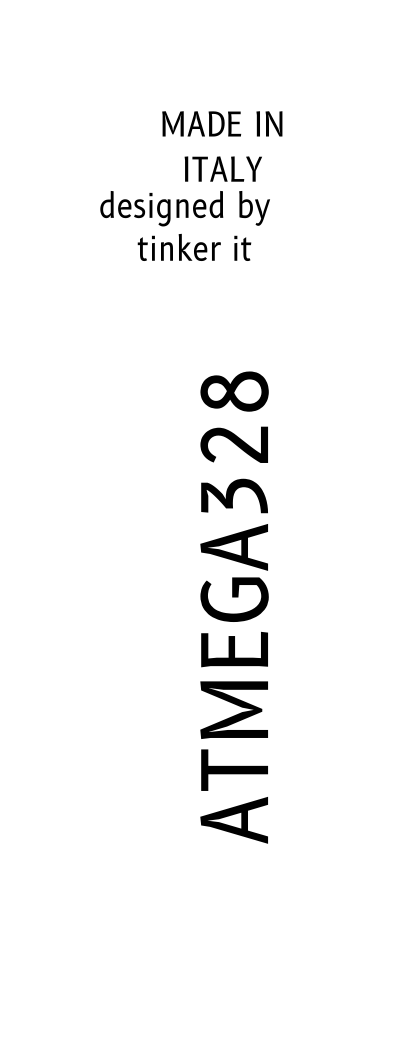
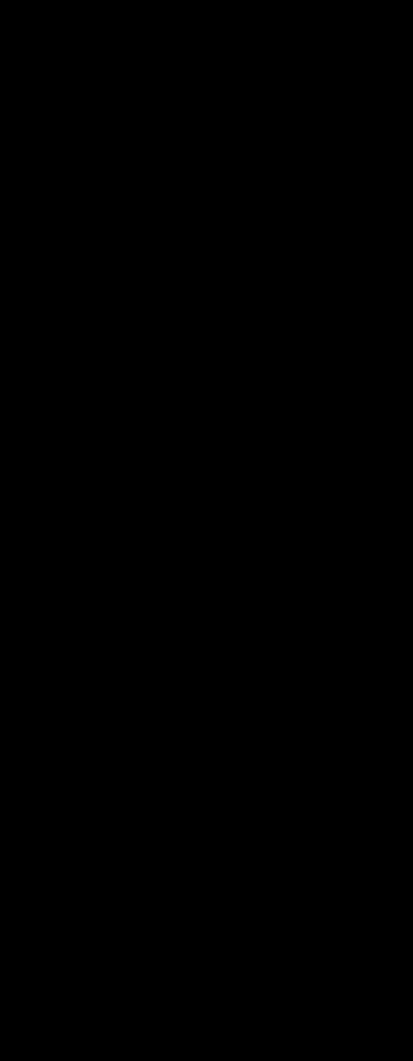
text: MADE IN (222, 123) -> none
text: ITALY (223, 169) -> none
text: designed by (185, 208) -> none
text: tinker it (194, 247) -> none
text: ATMEGA328 (234, 607) -> none

